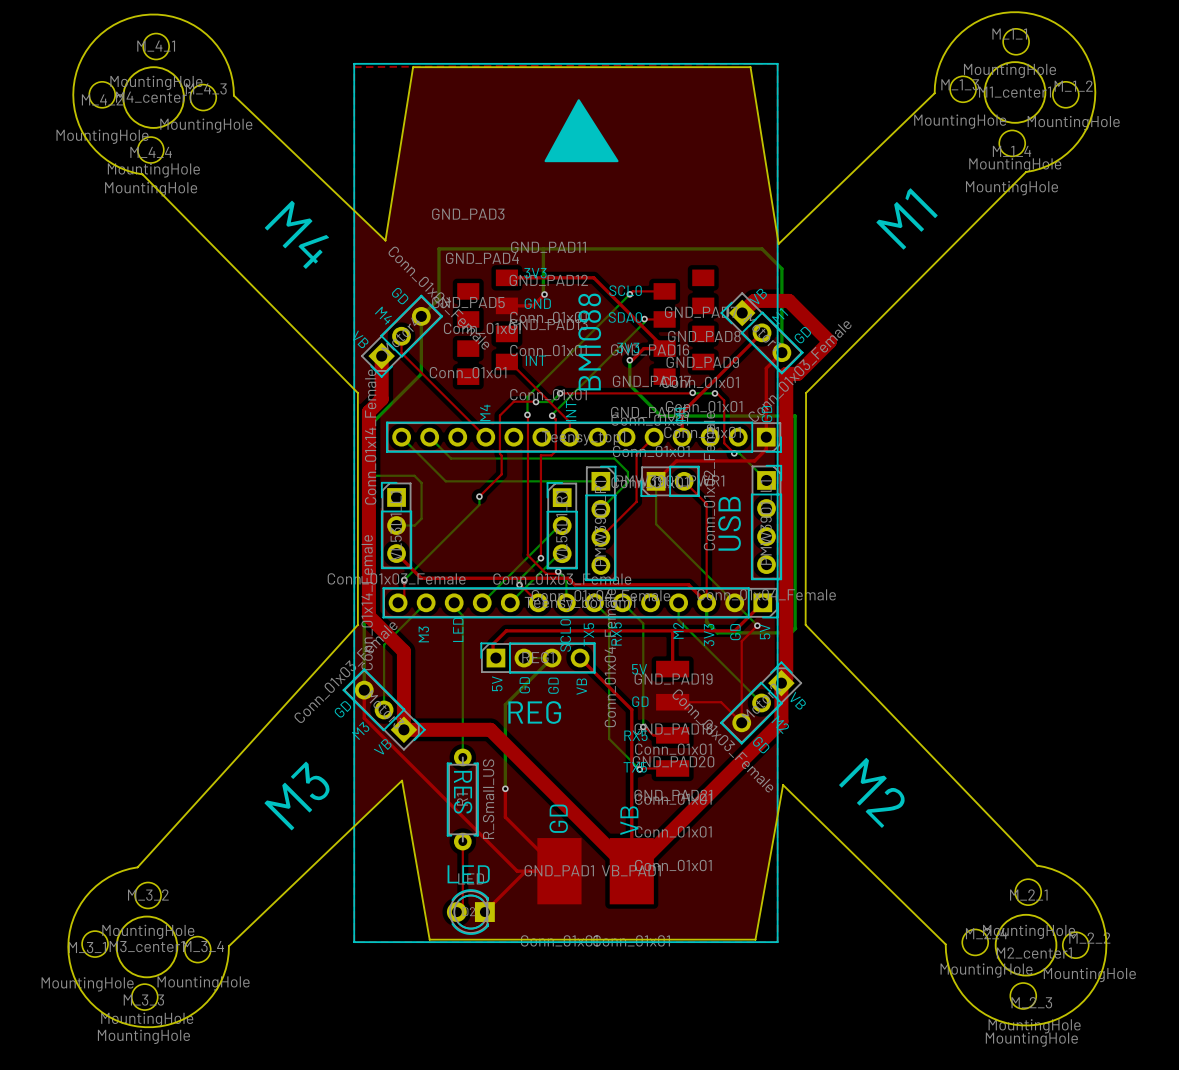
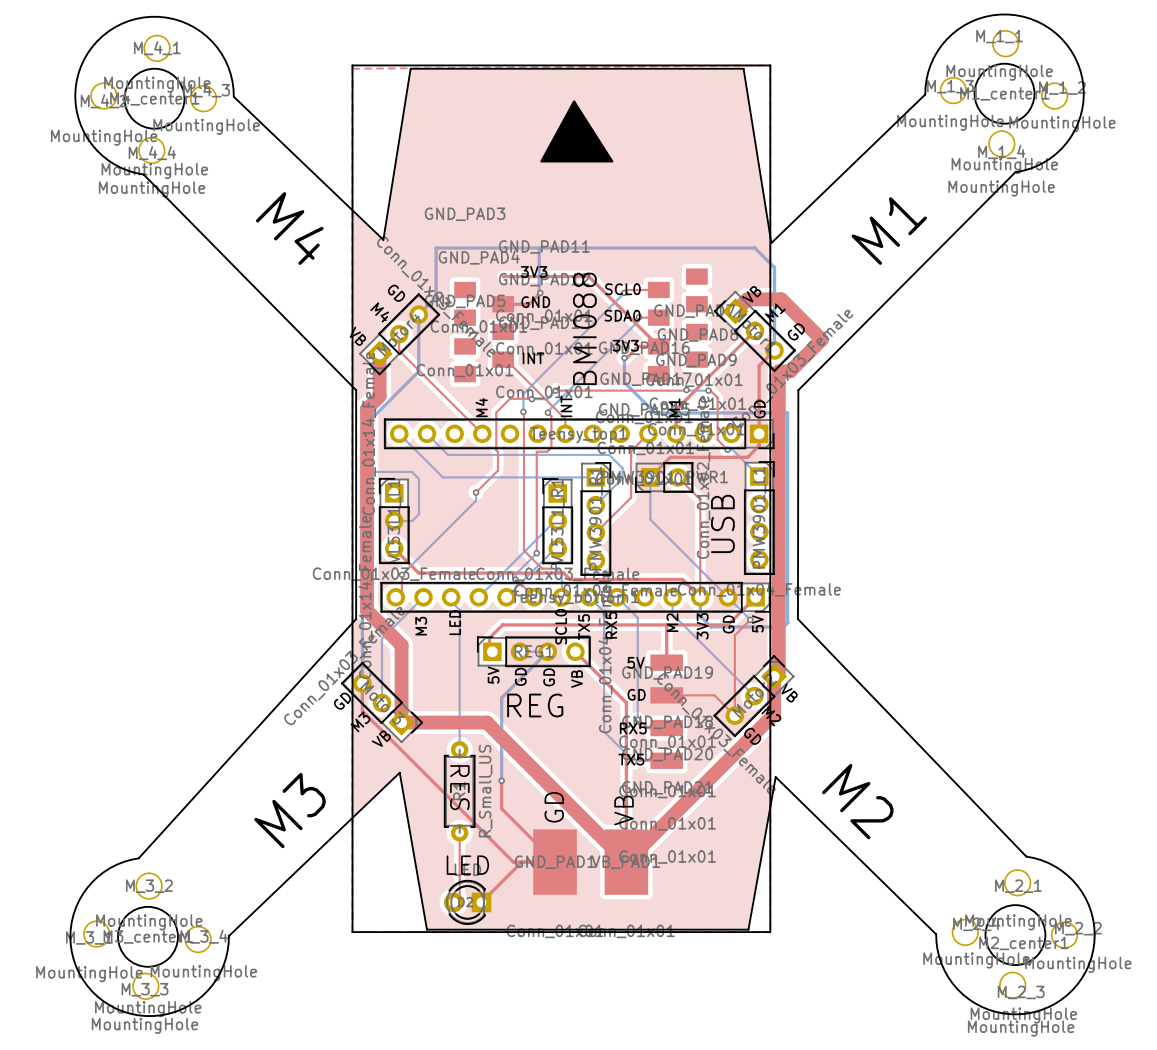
part: (506, 277) -> none
text position: M2 (871, 792) -> M2 (857, 801)
text position: M3 (297, 795) -> M3 (290, 810)

